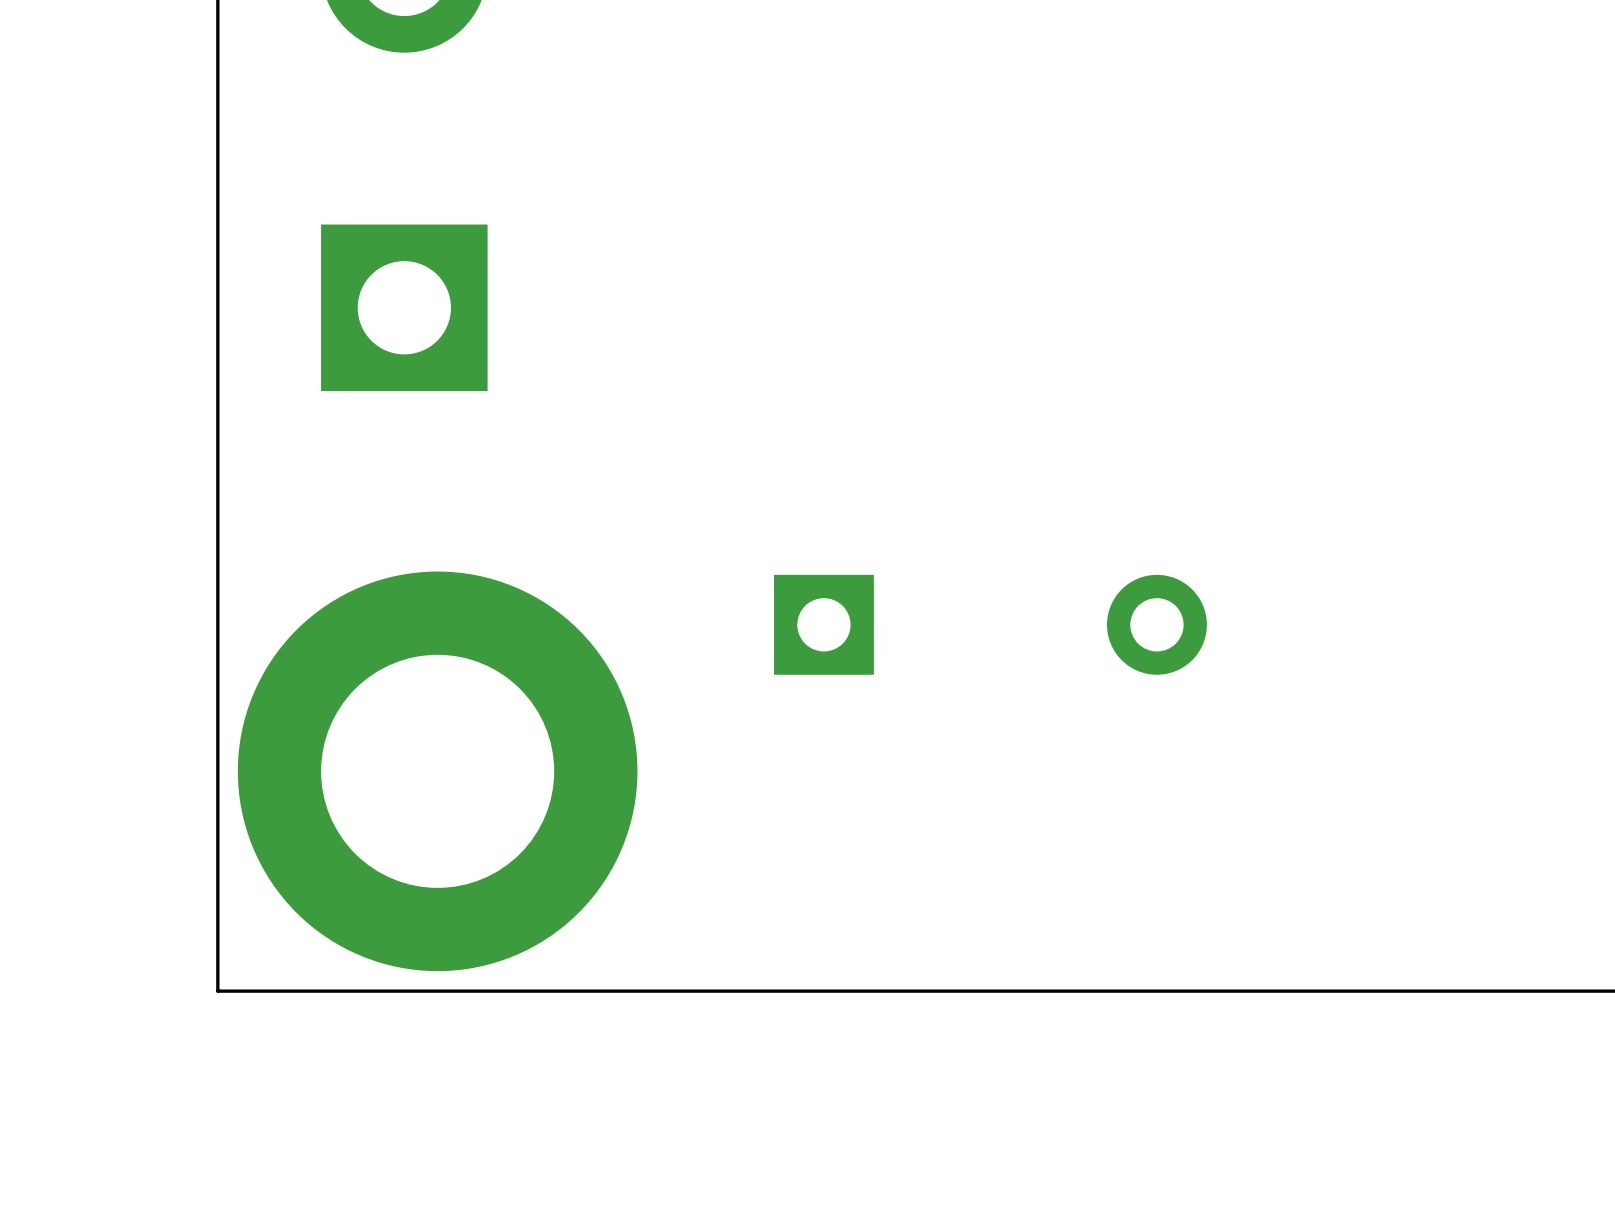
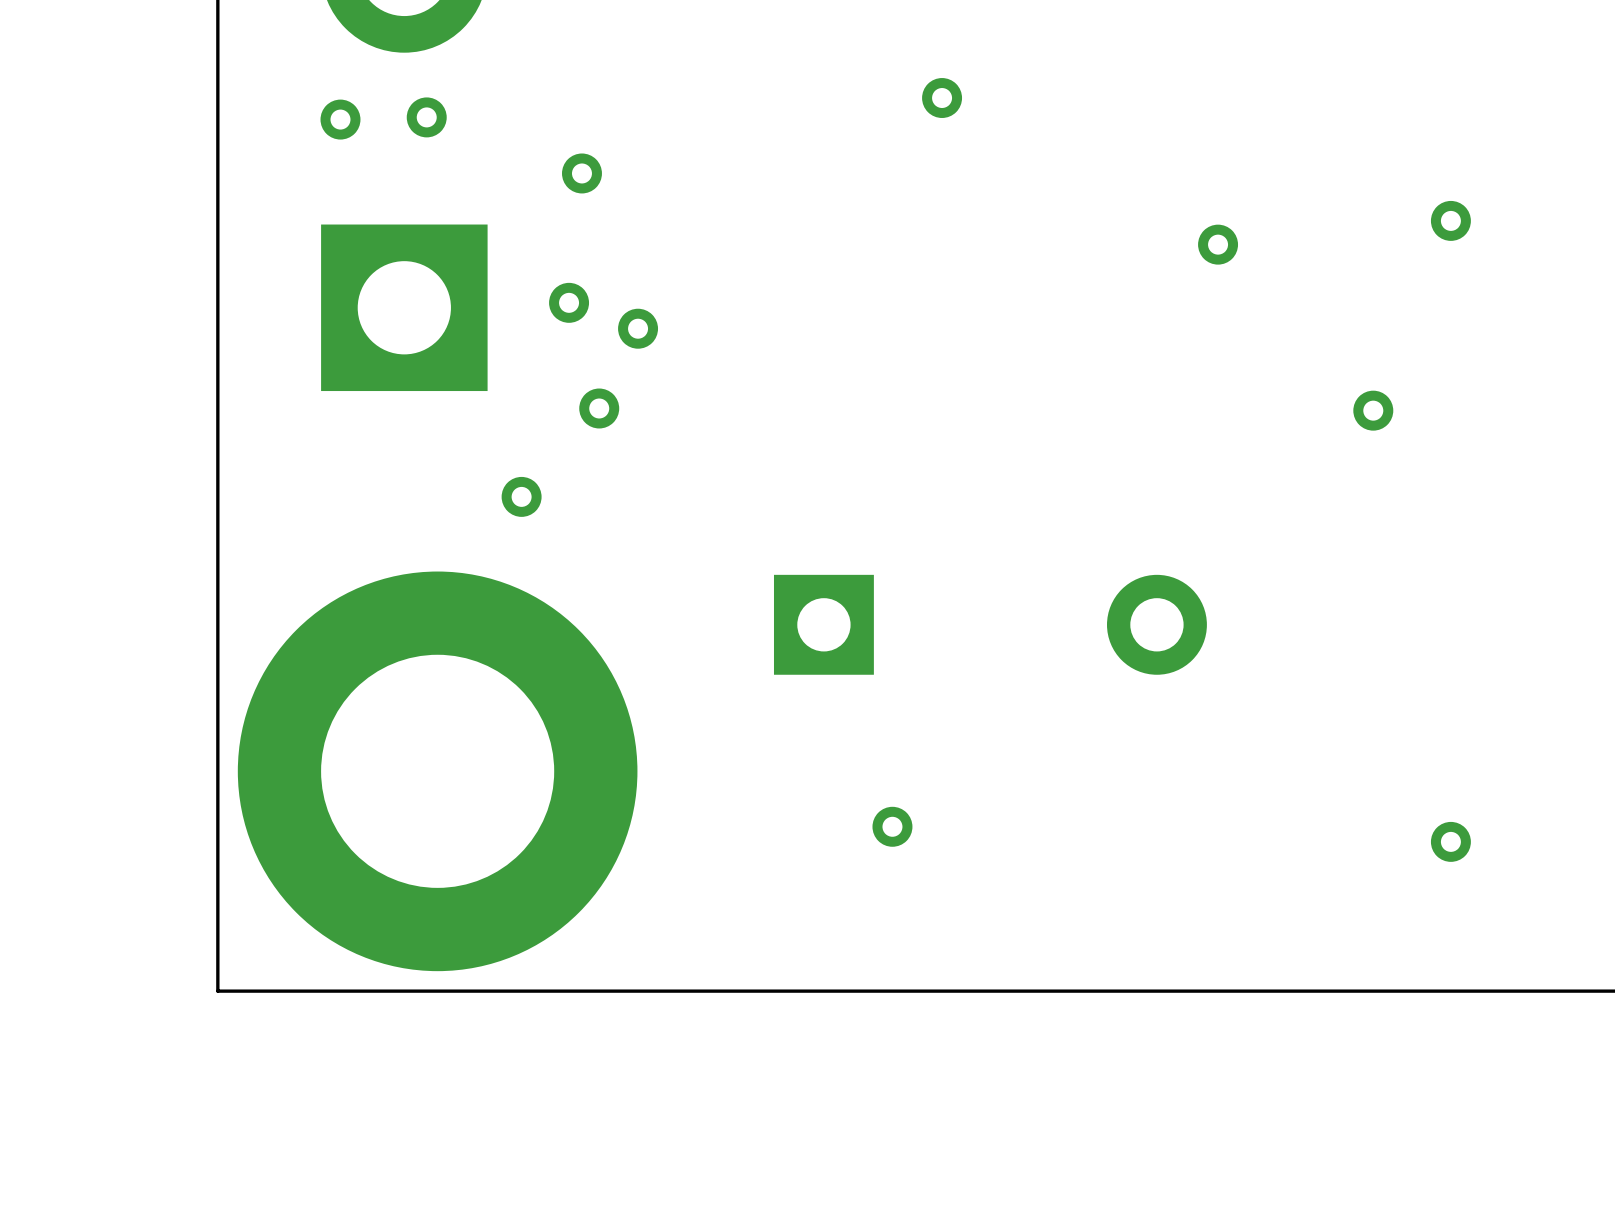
via: none -> (942, 98)
via: none -> (426, 117)
via: none -> (340, 119)
via: none -> (581, 173)
via: none -> (1450, 220)
via: none -> (1218, 244)
via: none -> (569, 302)
via: none -> (638, 328)
via: none -> (599, 408)
via: none -> (1373, 410)
via: none -> (521, 496)
via: none -> (892, 826)
via: none -> (1450, 841)

